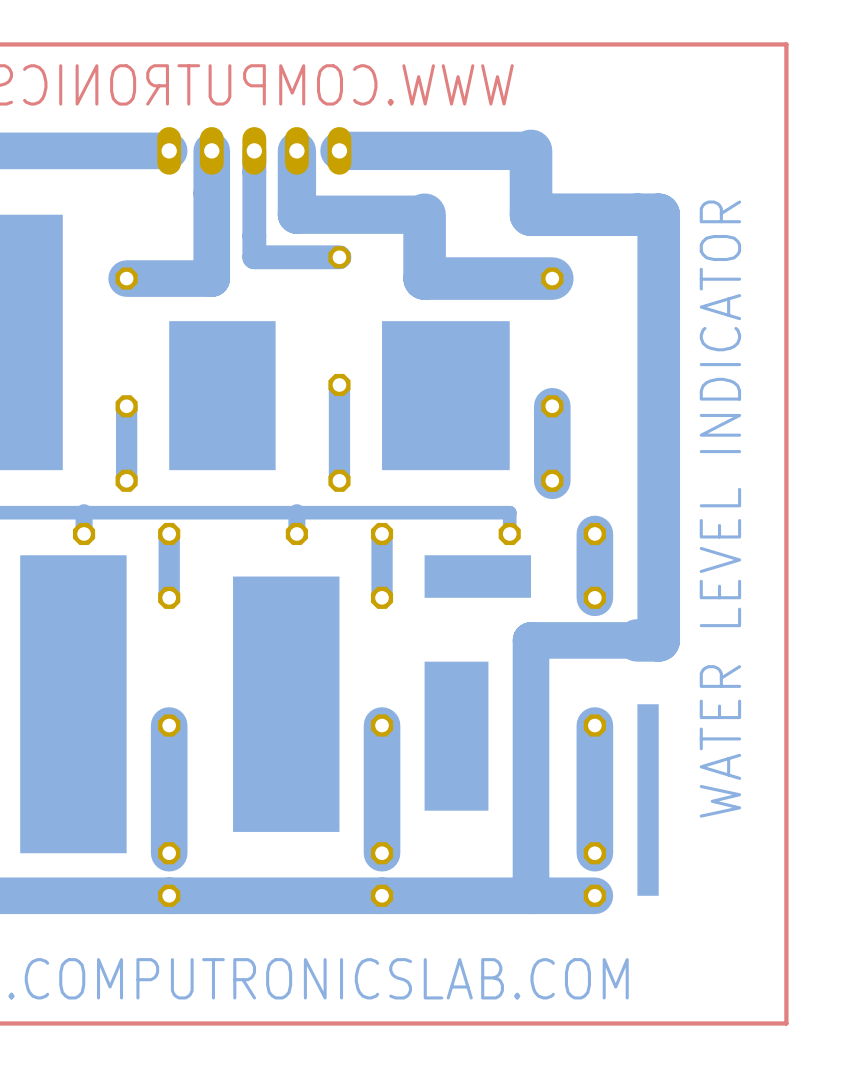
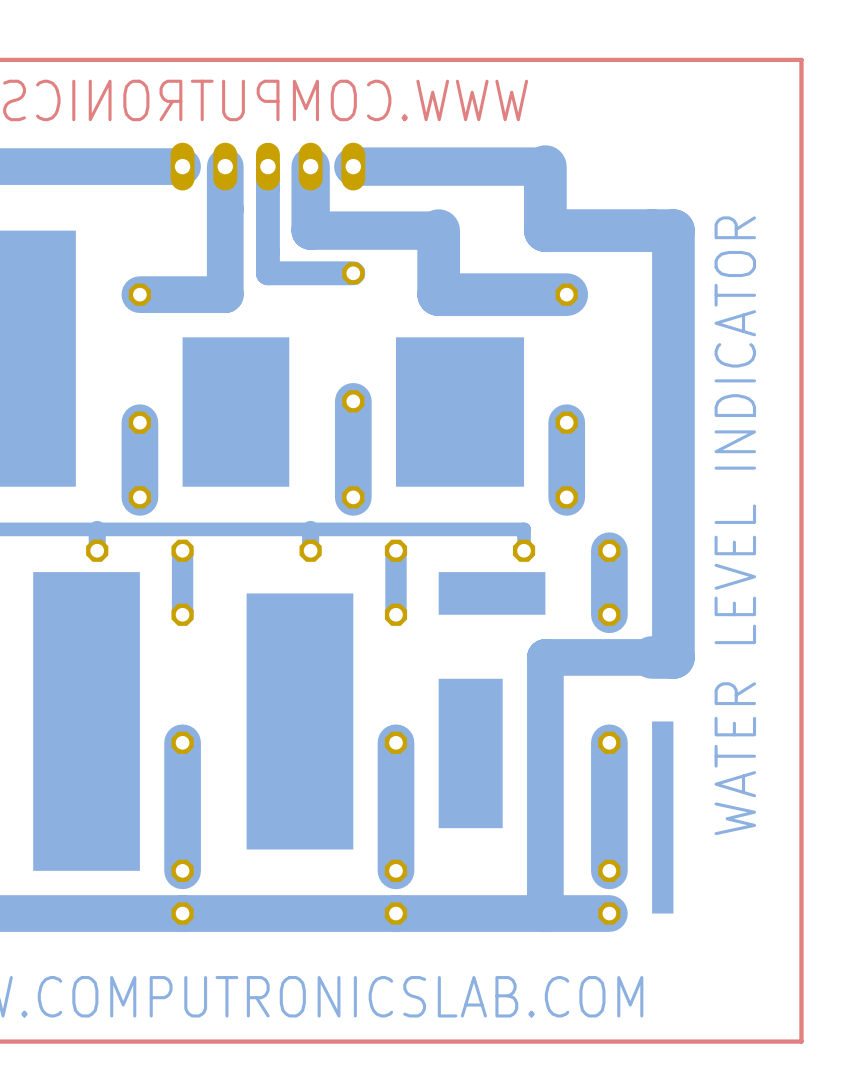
bottom track width: thin (339, 384) (339, 480) -> thick (353, 401) (353, 497)
bottom track width: thin (126, 406) (126, 480) -> thick (139, 422) (139, 497)

